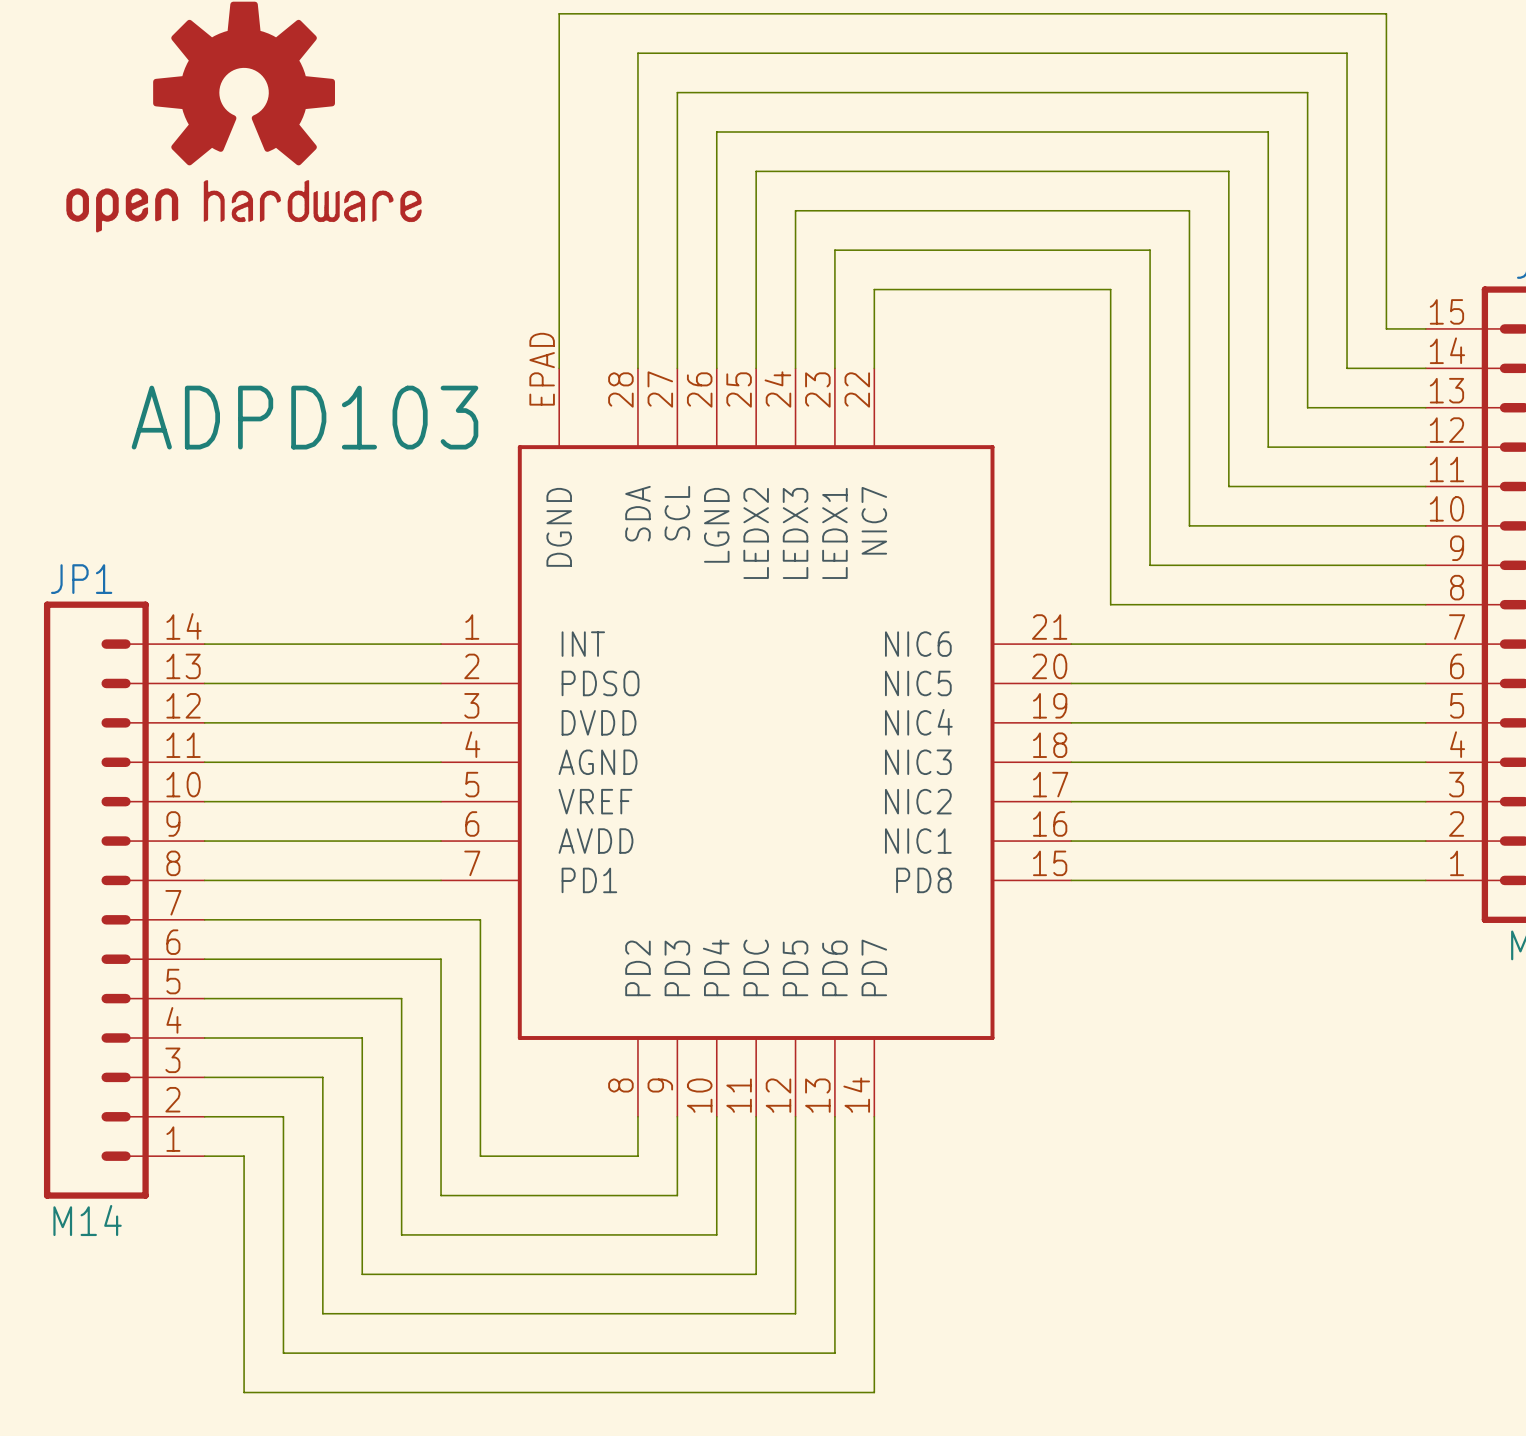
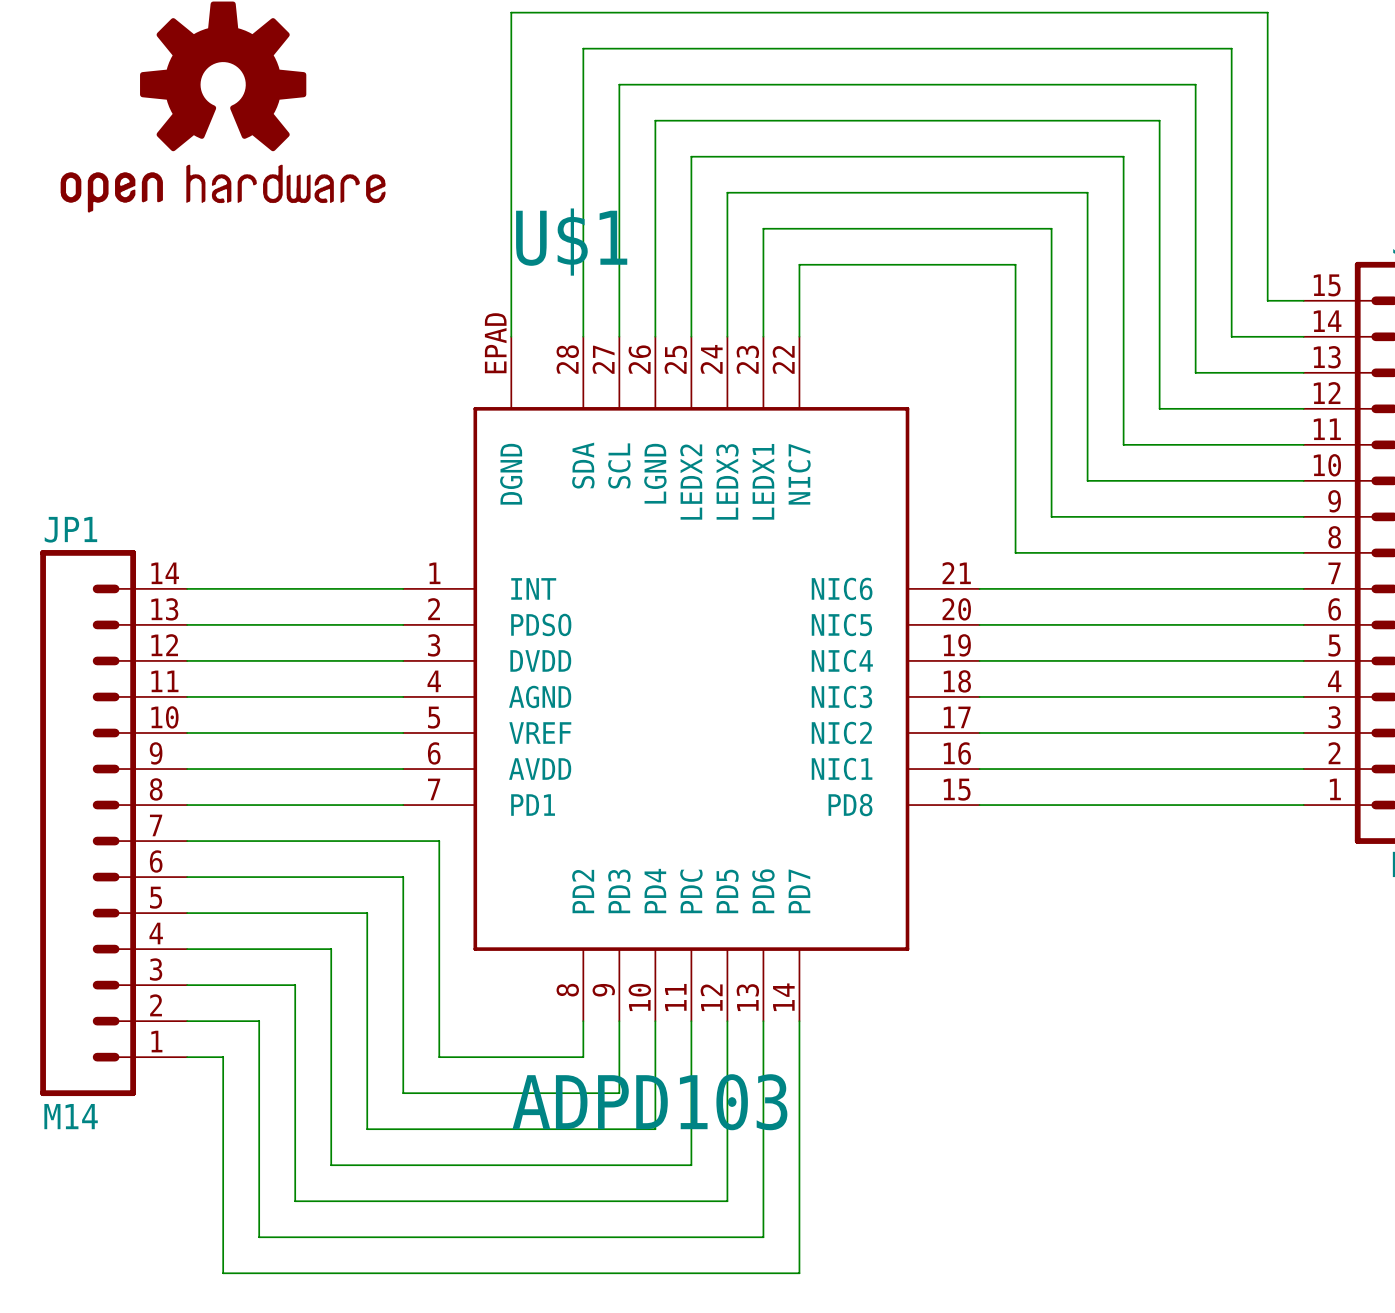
U$1 name: none -> U$1 (571, 242)
U$1 value position: ADPD103 (304, 417) -> ADPD103 (649, 1102)

